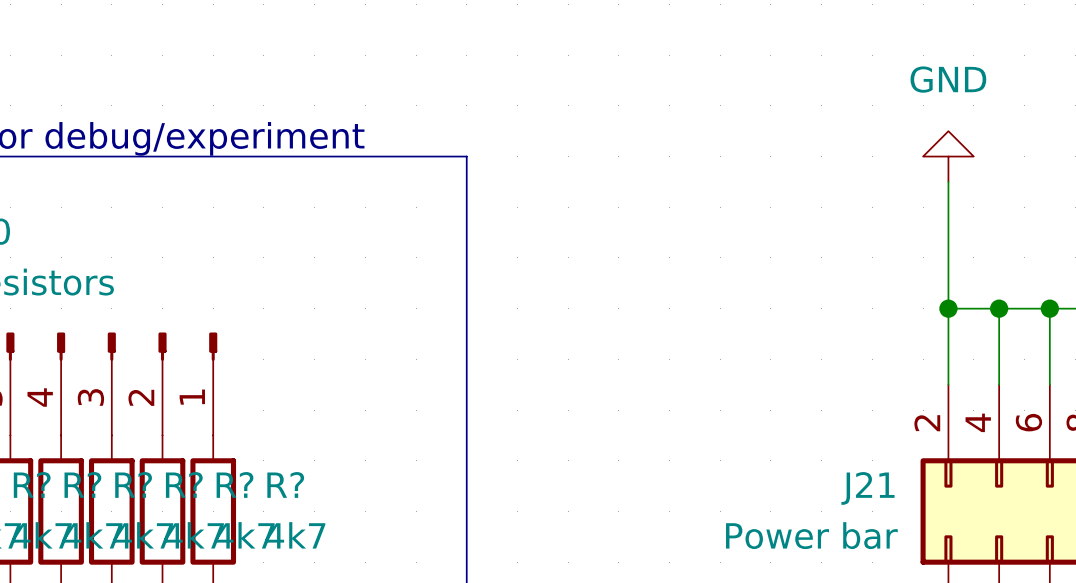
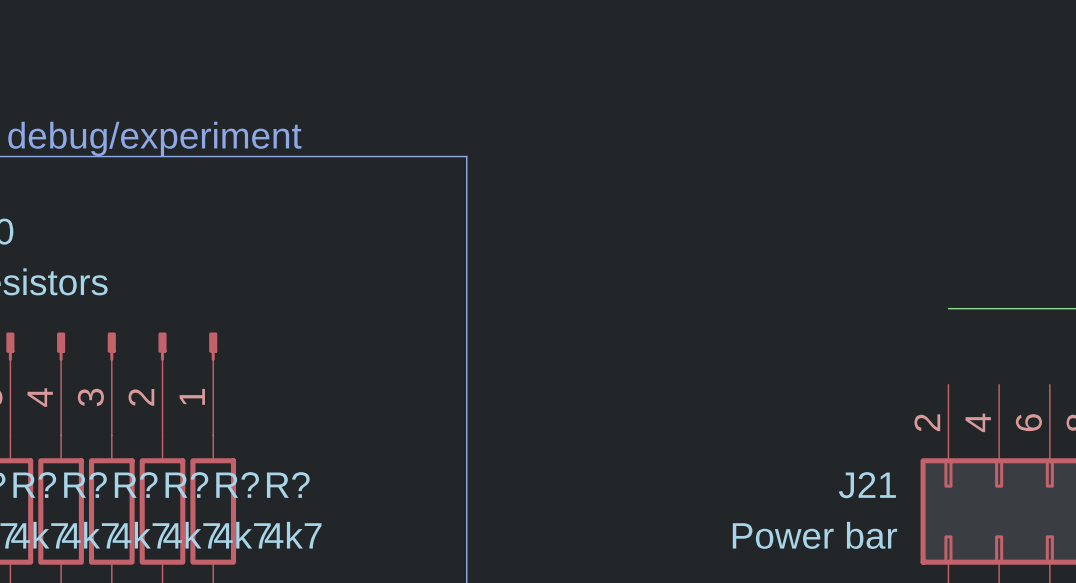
power symbol: GND (948, 156) -> none
wire: (948, 181) (948, 384) -> none
junction: (948, 308) -> none
wire: (999, 308) (999, 384) -> none
junction: (999, 308) -> none
wire: (1049, 308) (1049, 384) -> none
junction: (1049, 308) -> none

